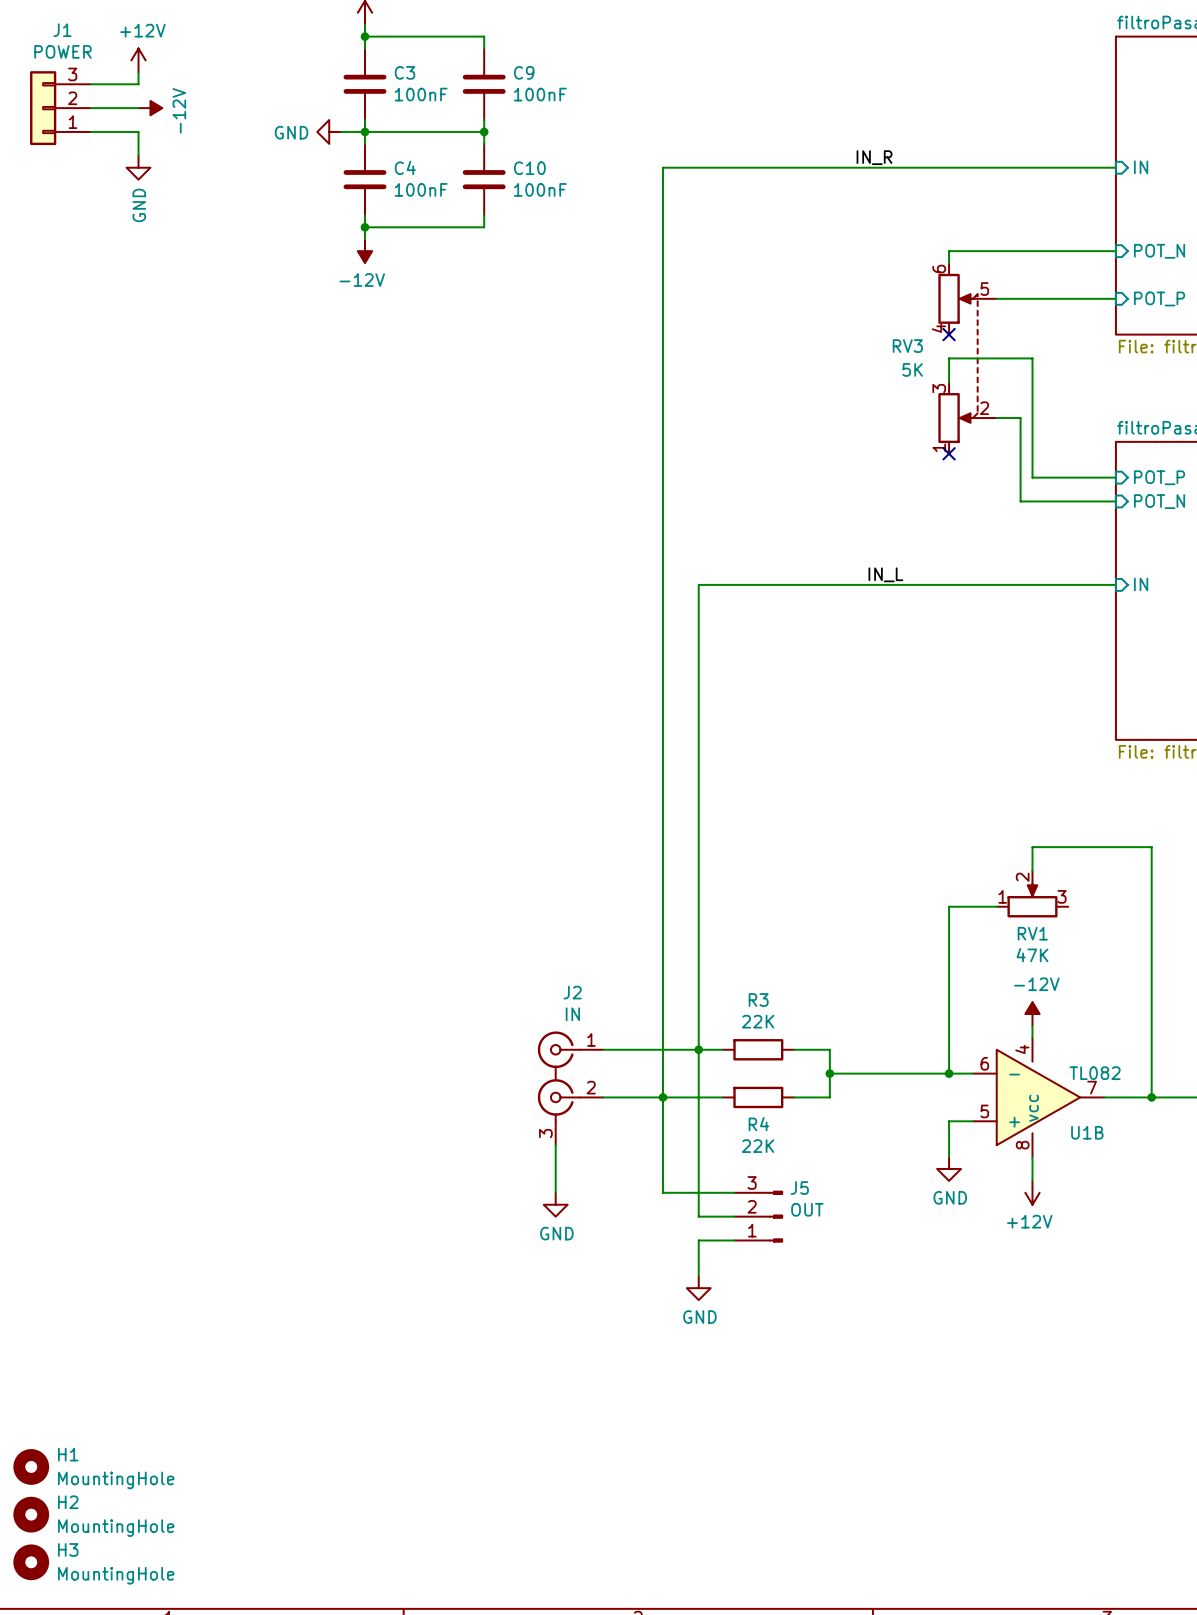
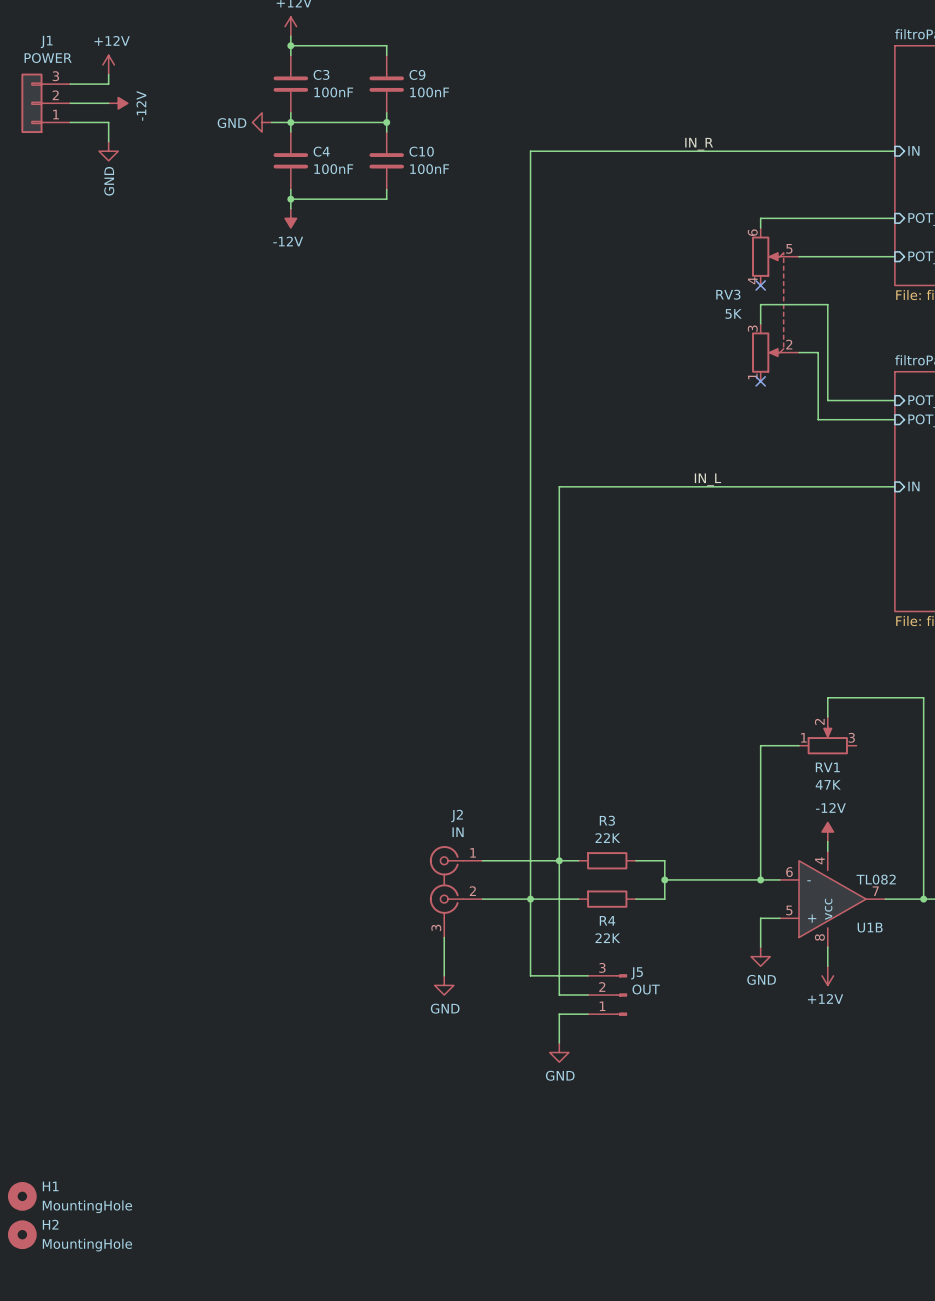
H3: MountingHole (31, 1562) -> none

